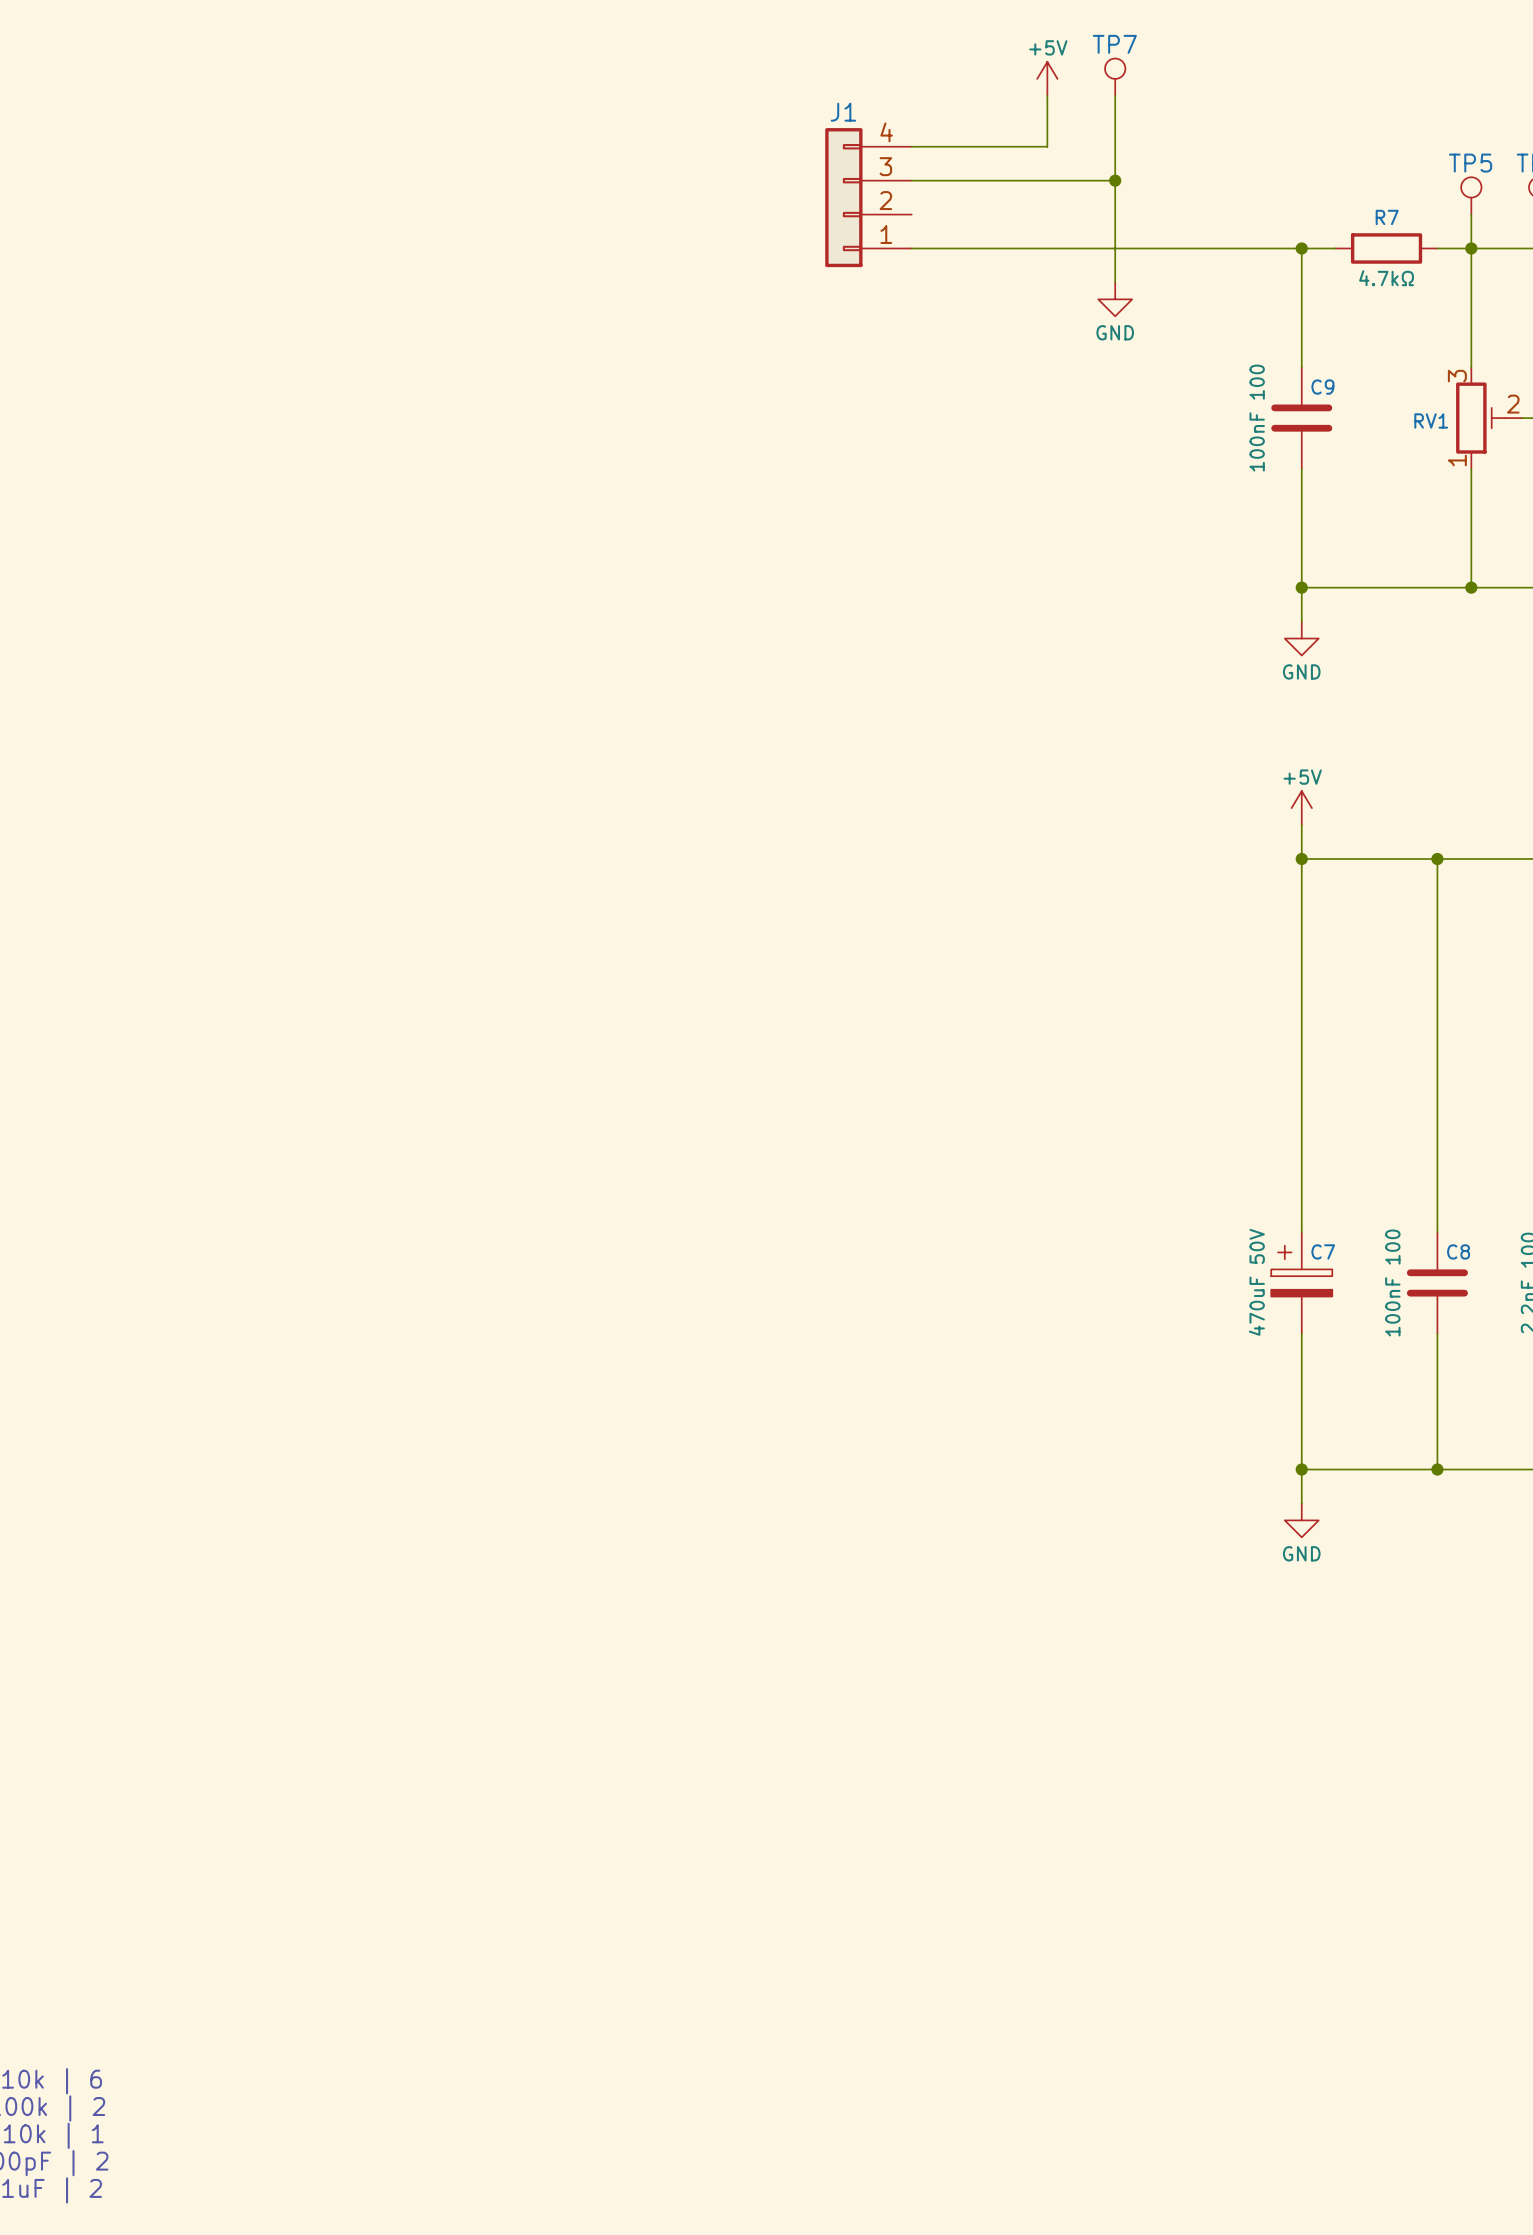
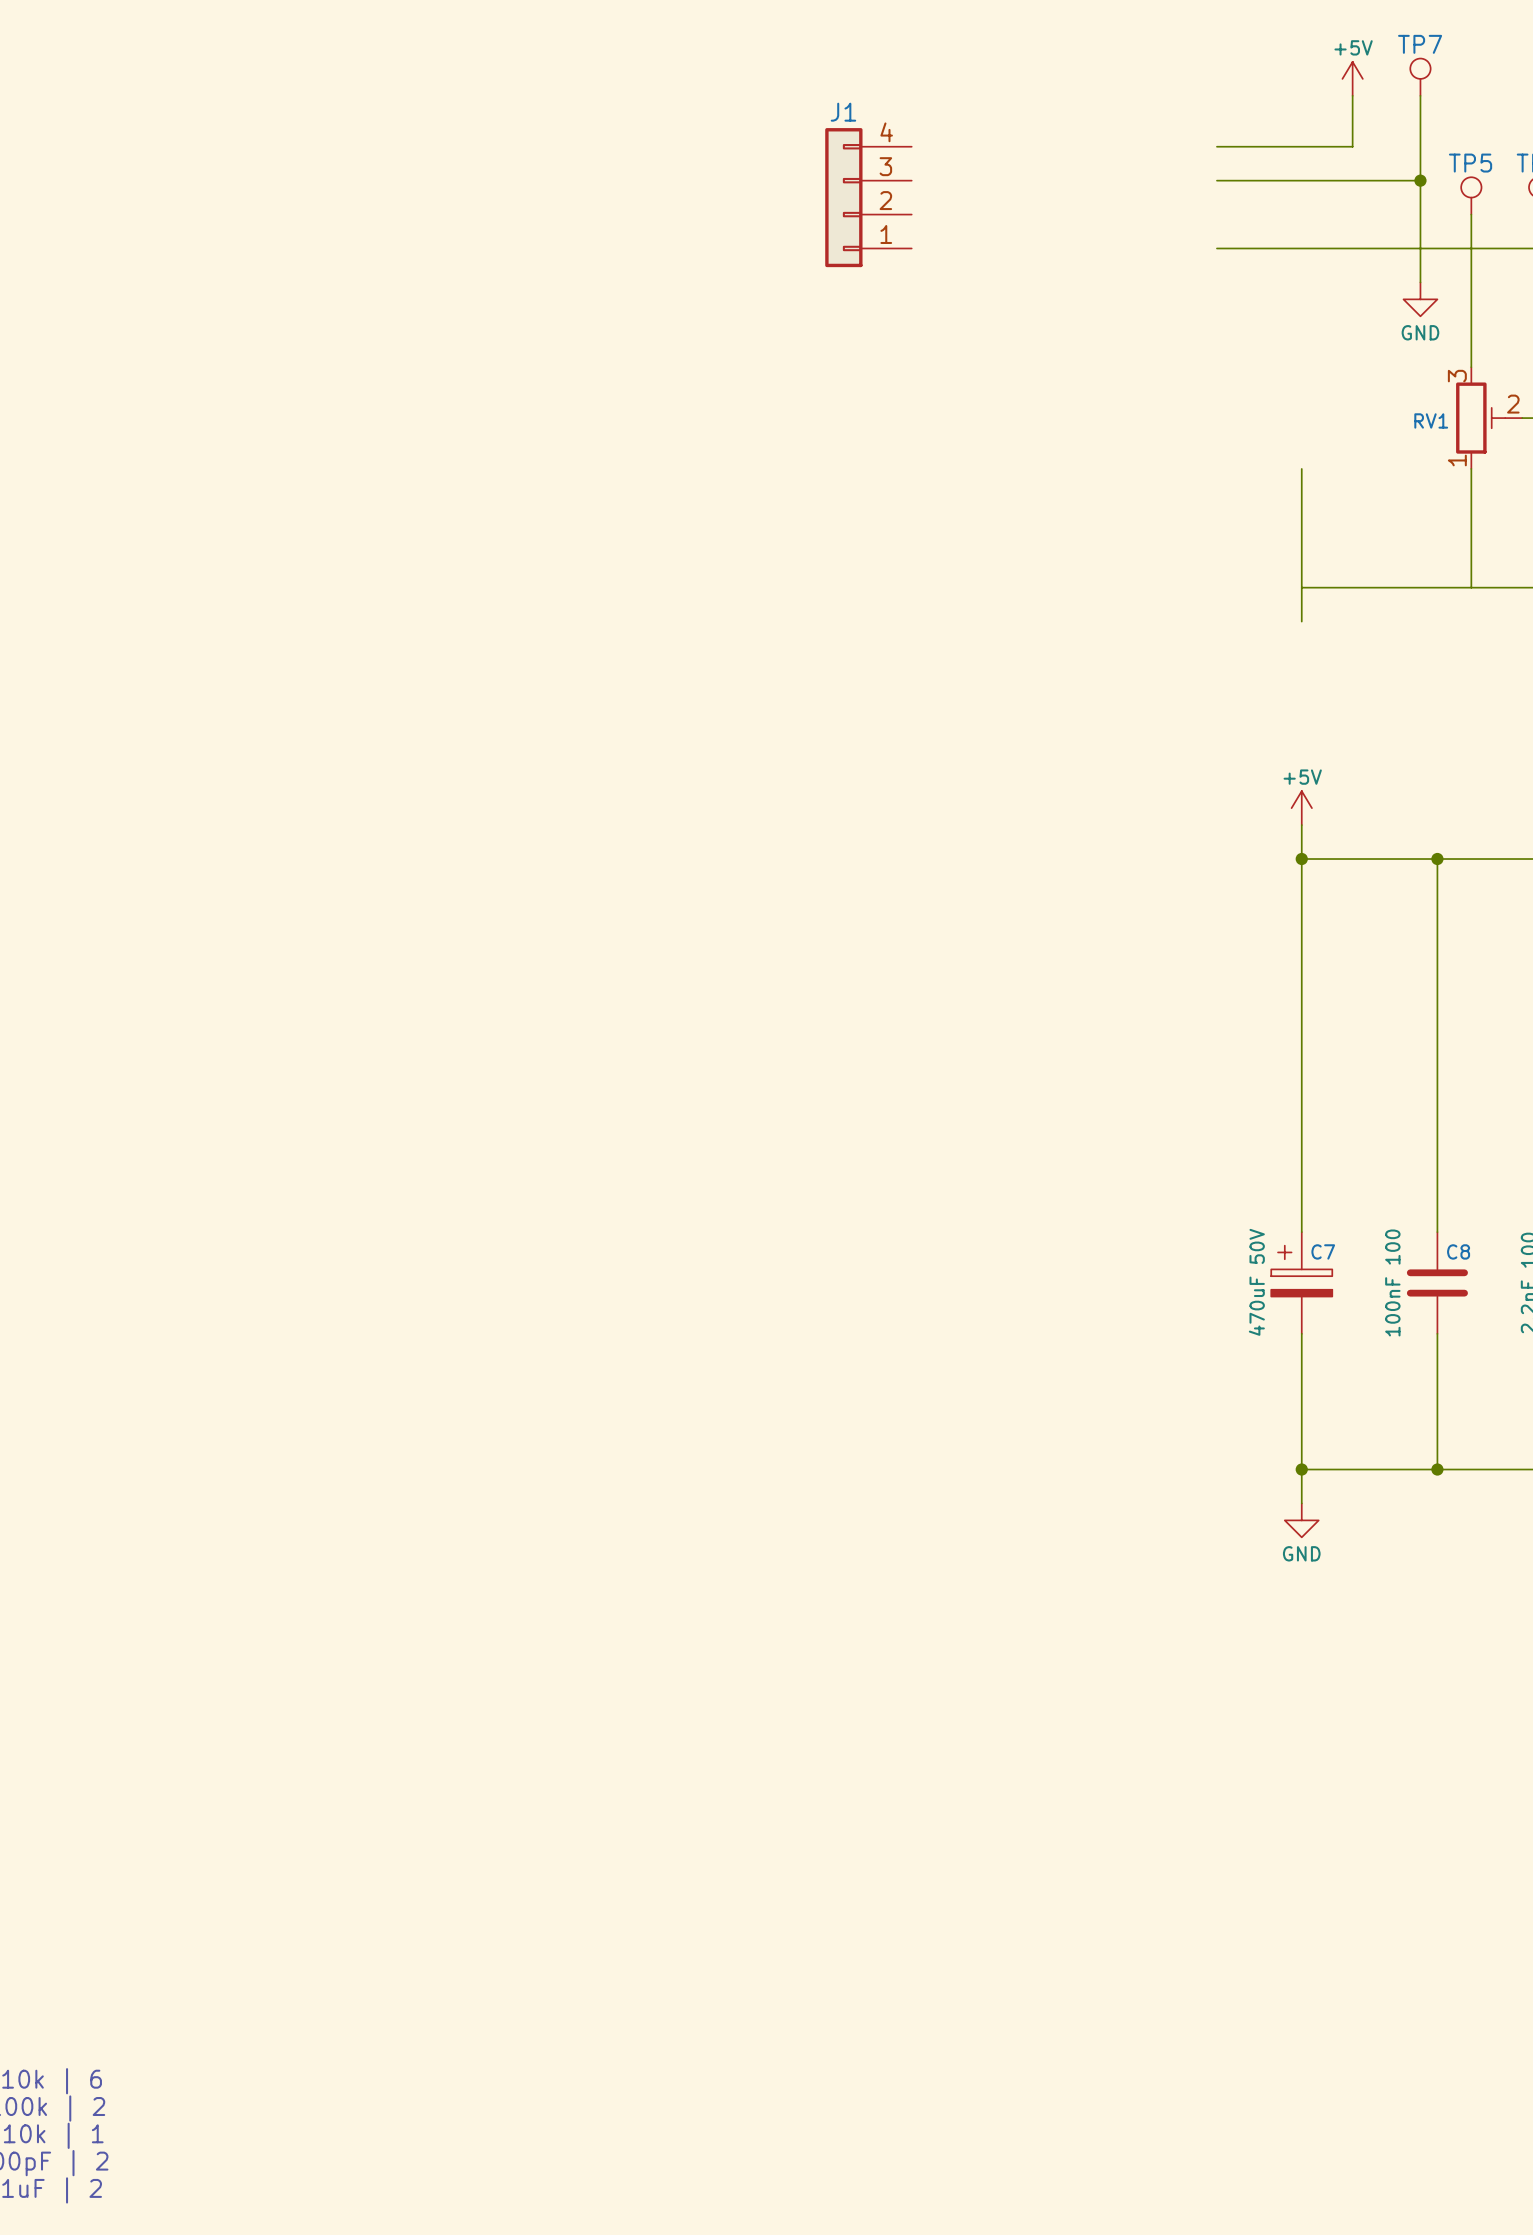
TP7 position: (1115, 77) -> (1420, 77)
power symbol position: +5V (1047, 78) -> +5V (1352, 78)
wire: (1047, 95) (1047, 146) (911, 146) -> (1352, 95) (1352, 146) (1216, 146)
wire: (1115, 95) (1115, 282) -> (1420, 95) (1420, 282)
wire: (911, 180) (1115, 180) -> (1216, 180) (1420, 180)
junction: (1115, 180) -> none
junction: none -> (1420, 180)
wire: (911, 248) (1216, 248) -> none
wire: (1301, 248) (1301, 367) -> none
junction: (1301, 248) -> none
wire: none -> (1335, 248) (1437, 248)
R7: 4.7kΩ (1386, 248) -> none
junction: (1471, 248) -> none
power symbol: GND (1115, 299) -> none
power symbol: none -> GND (1420, 299)
C9: 100nF 100 (1301, 418) -> none
junction: (1301, 587) -> none
junction: (1471, 587) -> none
power symbol: GND (1301, 638) -> none

